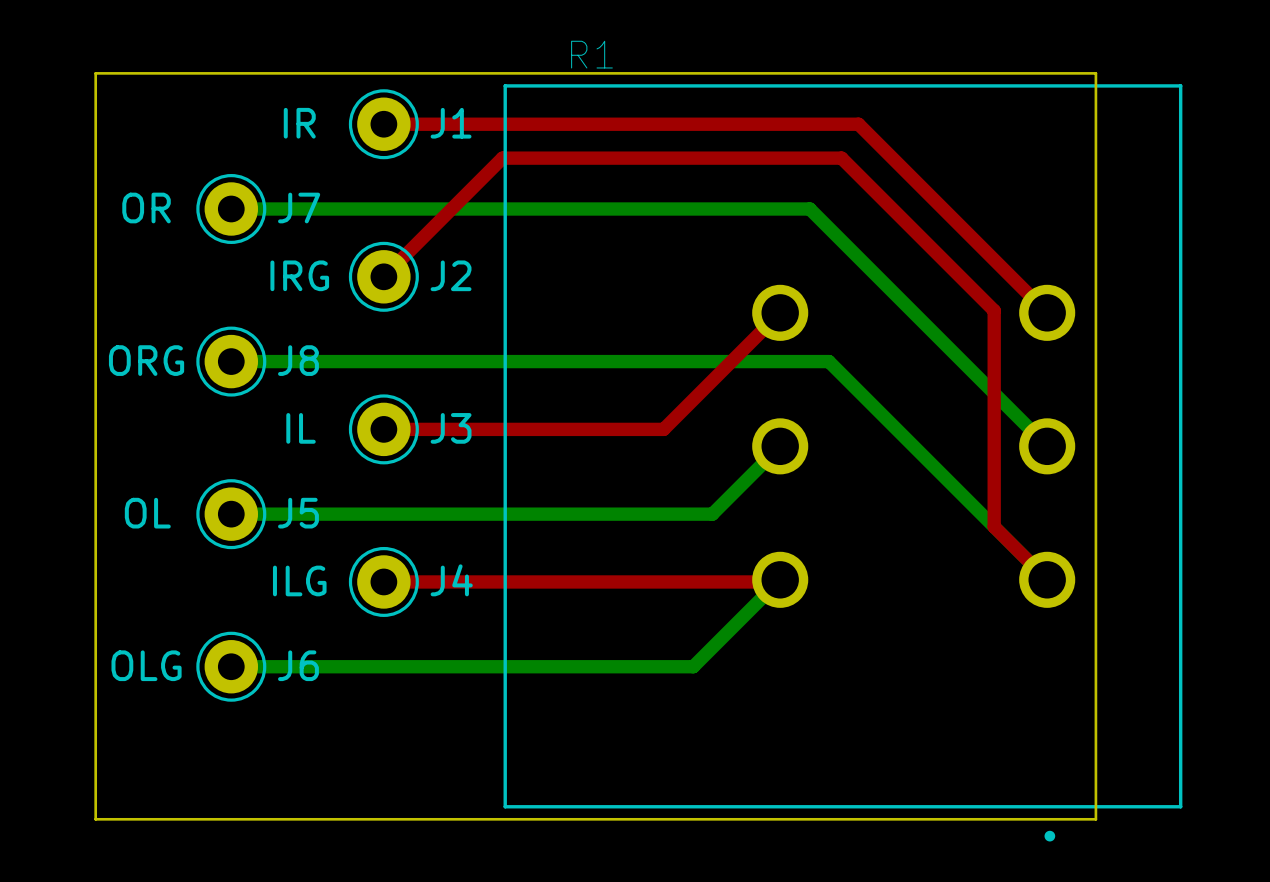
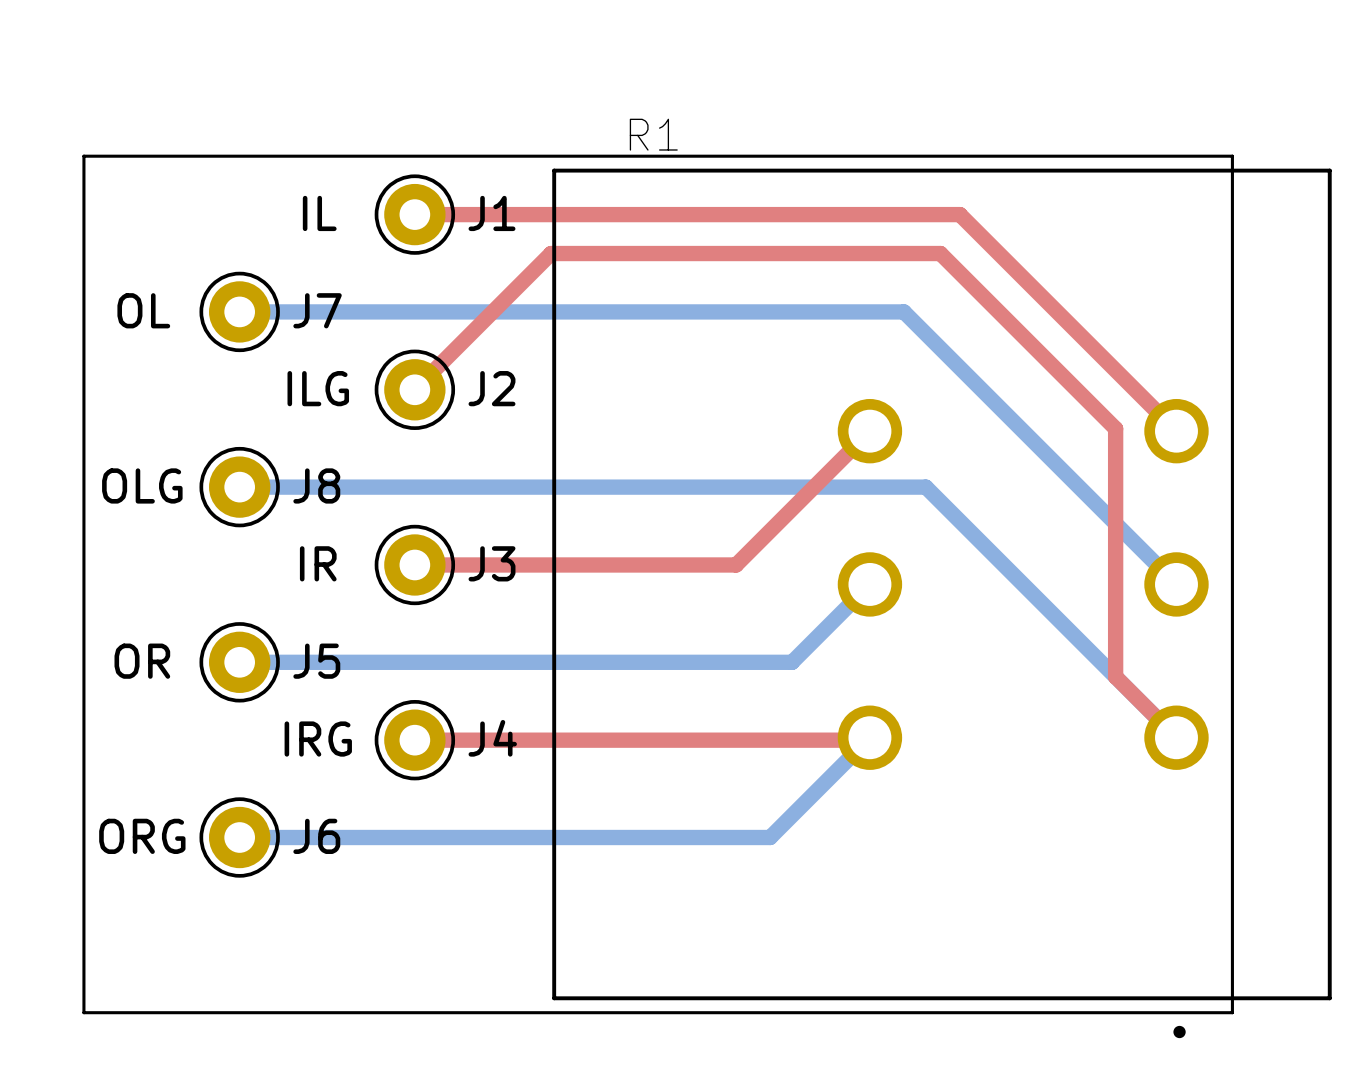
text: IR (299, 123) -> IL (319, 213)
text: OR (146, 208) -> OL (143, 310)
text: IRG (299, 275) -> ILG (318, 388)
text: ORG (146, 360) -> OLG (142, 485)
text: IL (301, 428) -> IR (318, 563)
text: OL (147, 513) -> OR (142, 661)
text: ILG (299, 580) -> IRG (318, 739)
text: OLG (146, 665) -> ORG (142, 836)

